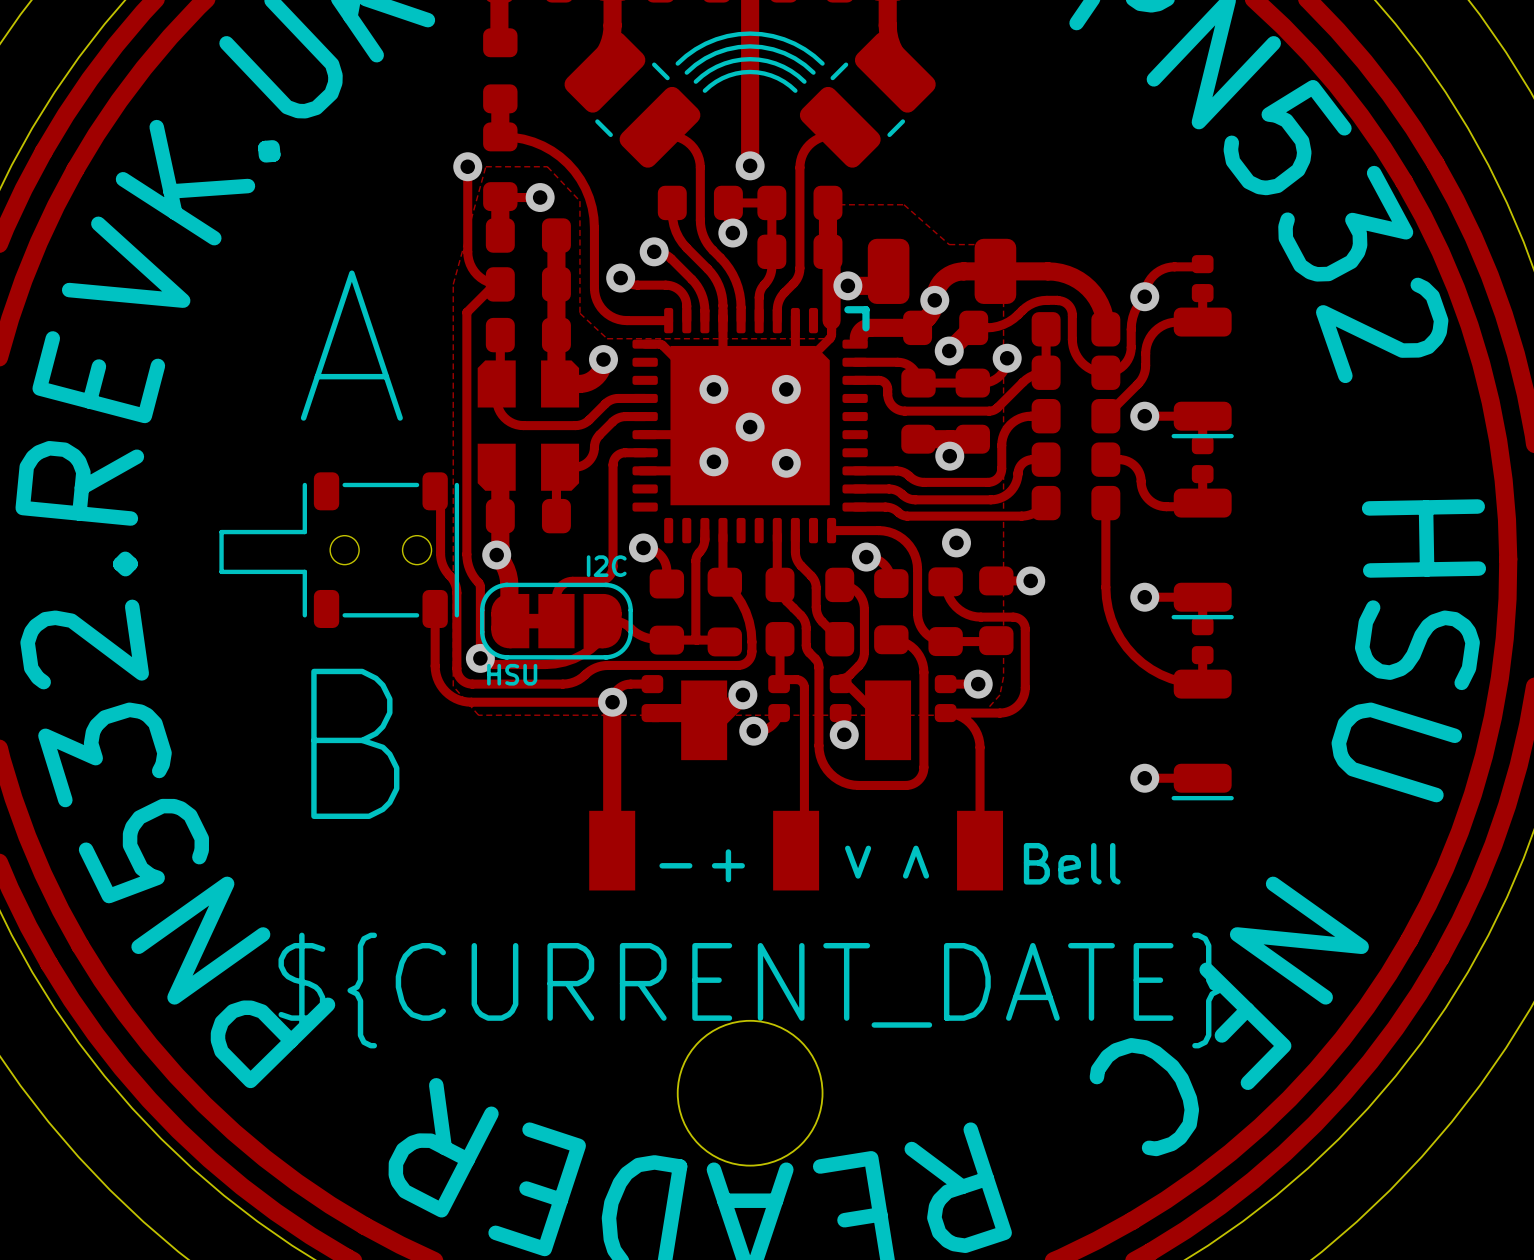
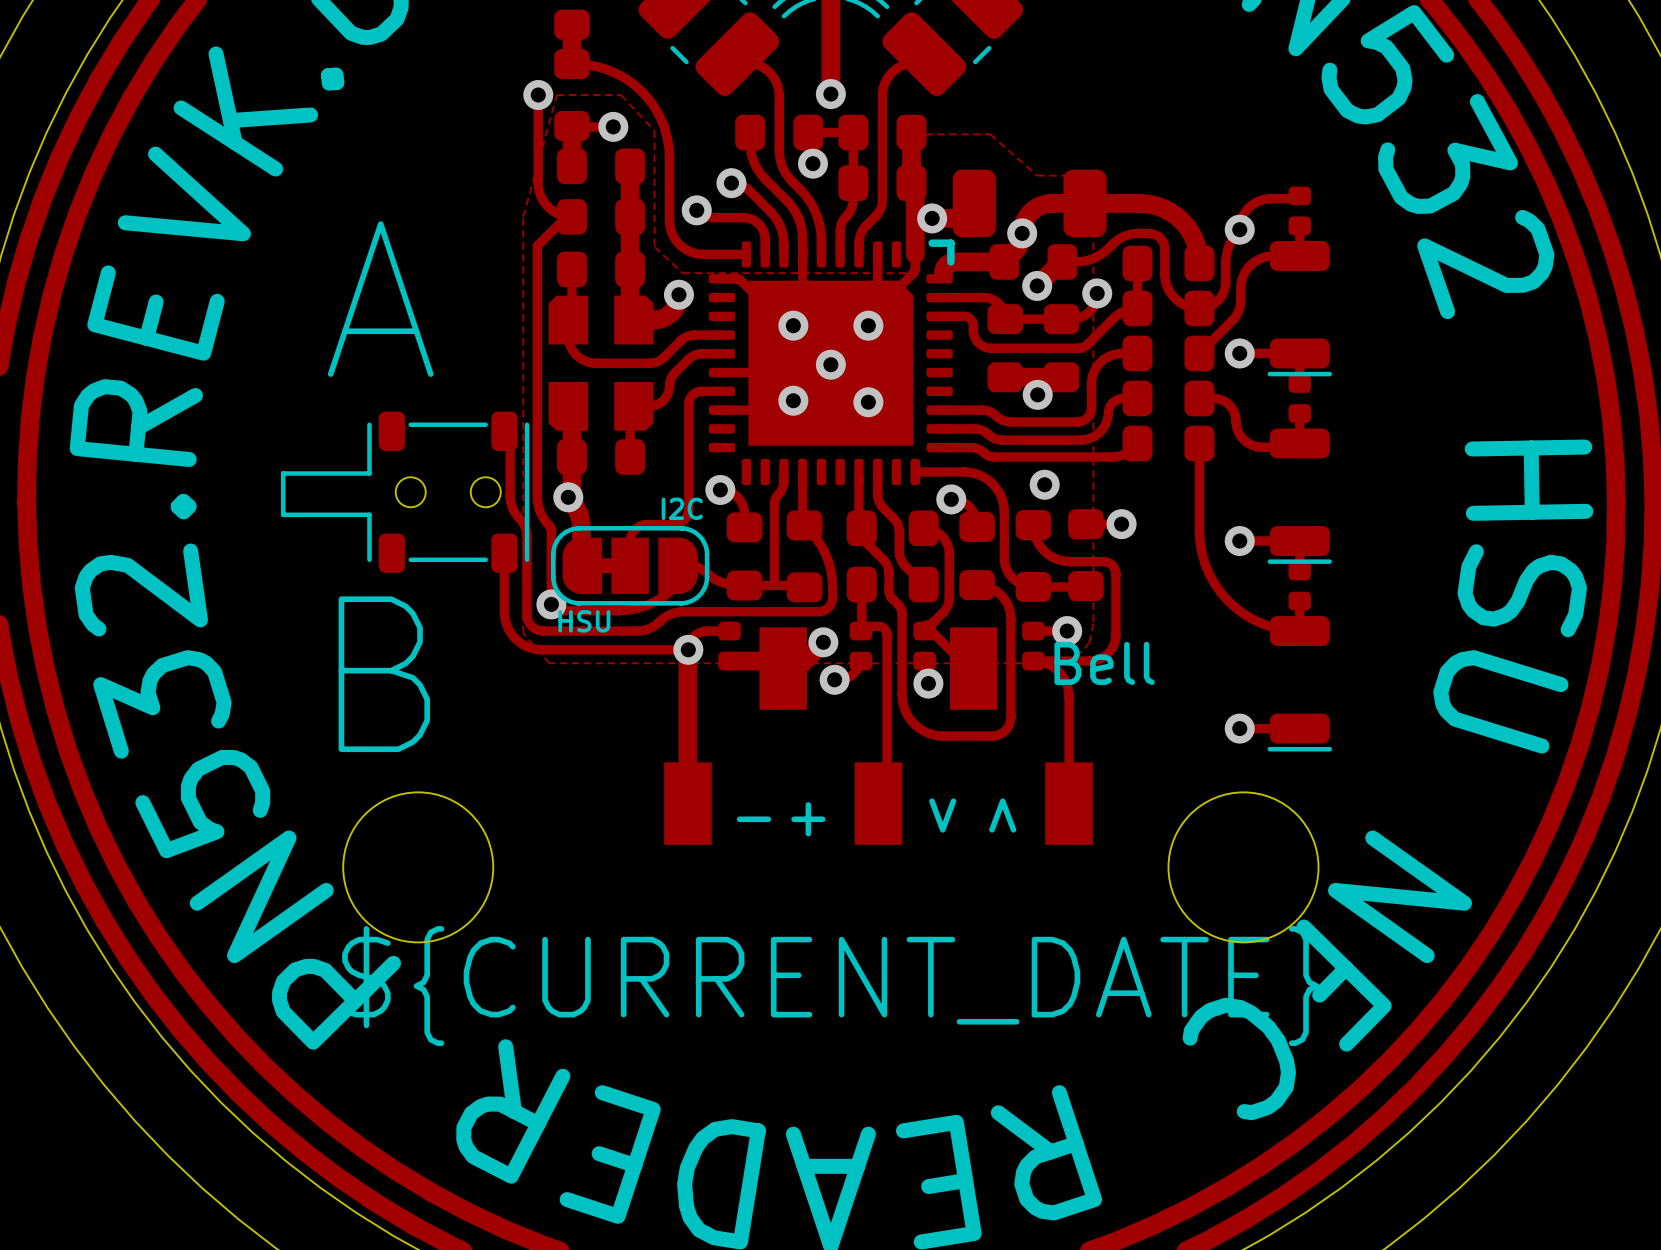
text position: A (351, 345) -> A (380, 299)
text position: B (355, 743) -> B (384, 674)
round board edge: none -> [342, 791, 495, 944]
round board edge: none -> [1167, 791, 1320, 944]
text position: Bell (1072, 863) -> Bell (1104, 663)
text position: ${CURRENT_DATE} (750, 990) -> ${CURRENT_DATE} (830, 986)
round board edge: [676, 1019, 824, 1167] -> none

